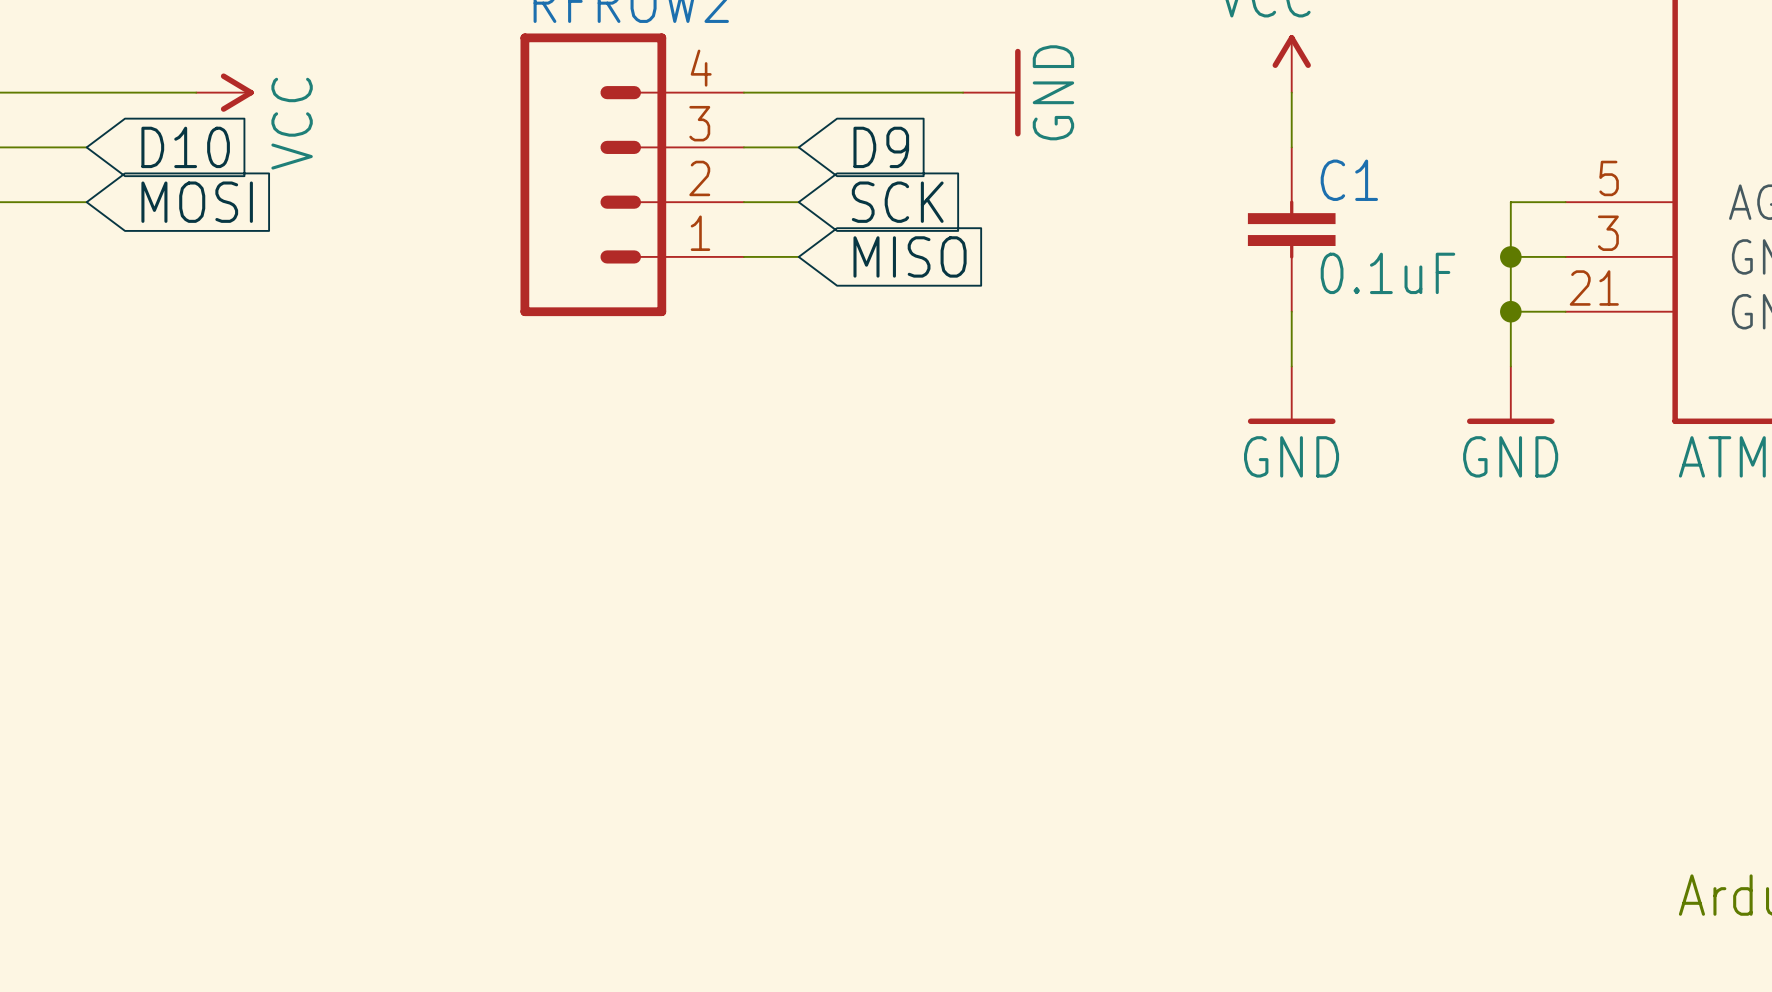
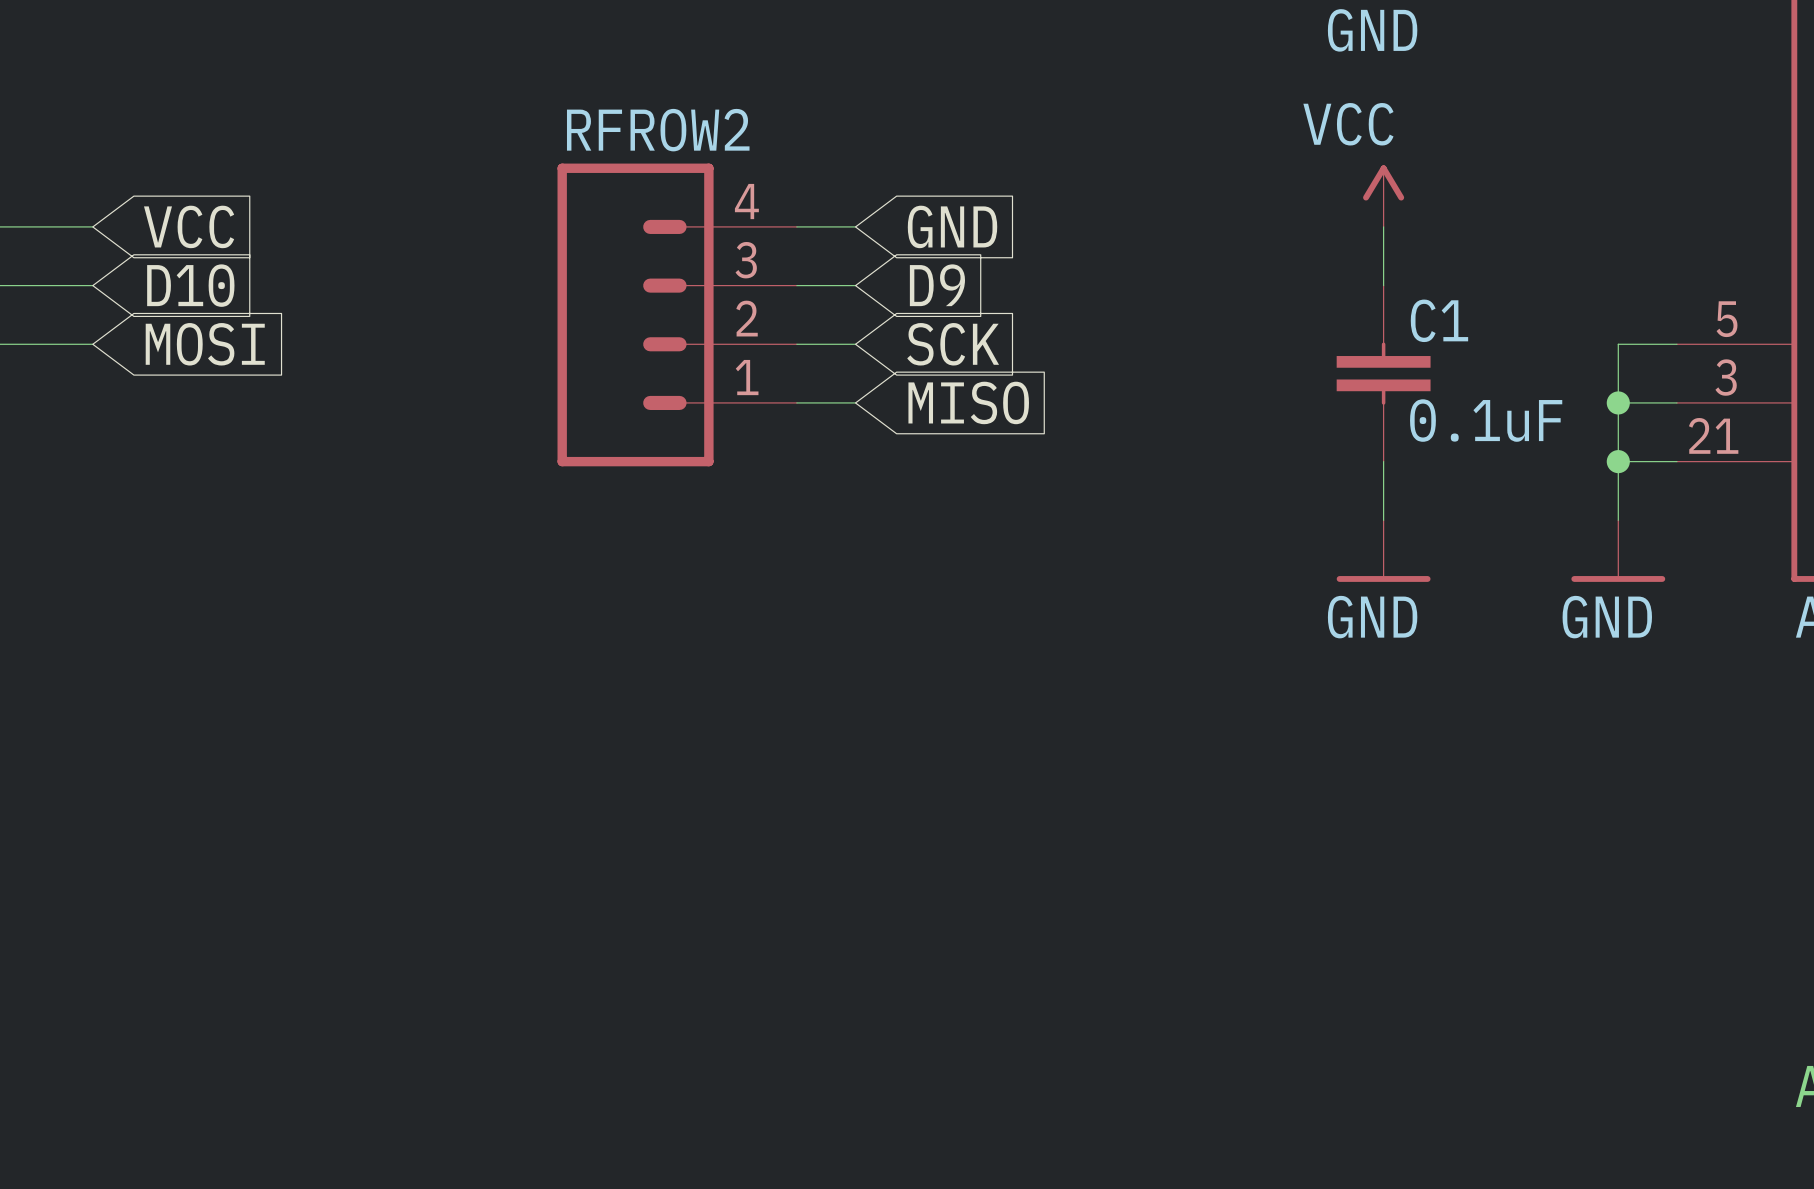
wire: (86, 92) (196, 92) -> none
global label: none -> VCC (189, 226)
power symbol: VCC (224, 92) -> none
wire: (798, 92) (963, 92) -> none
global label: none -> GND (952, 226)
power symbol: GND (991, 92) -> none

